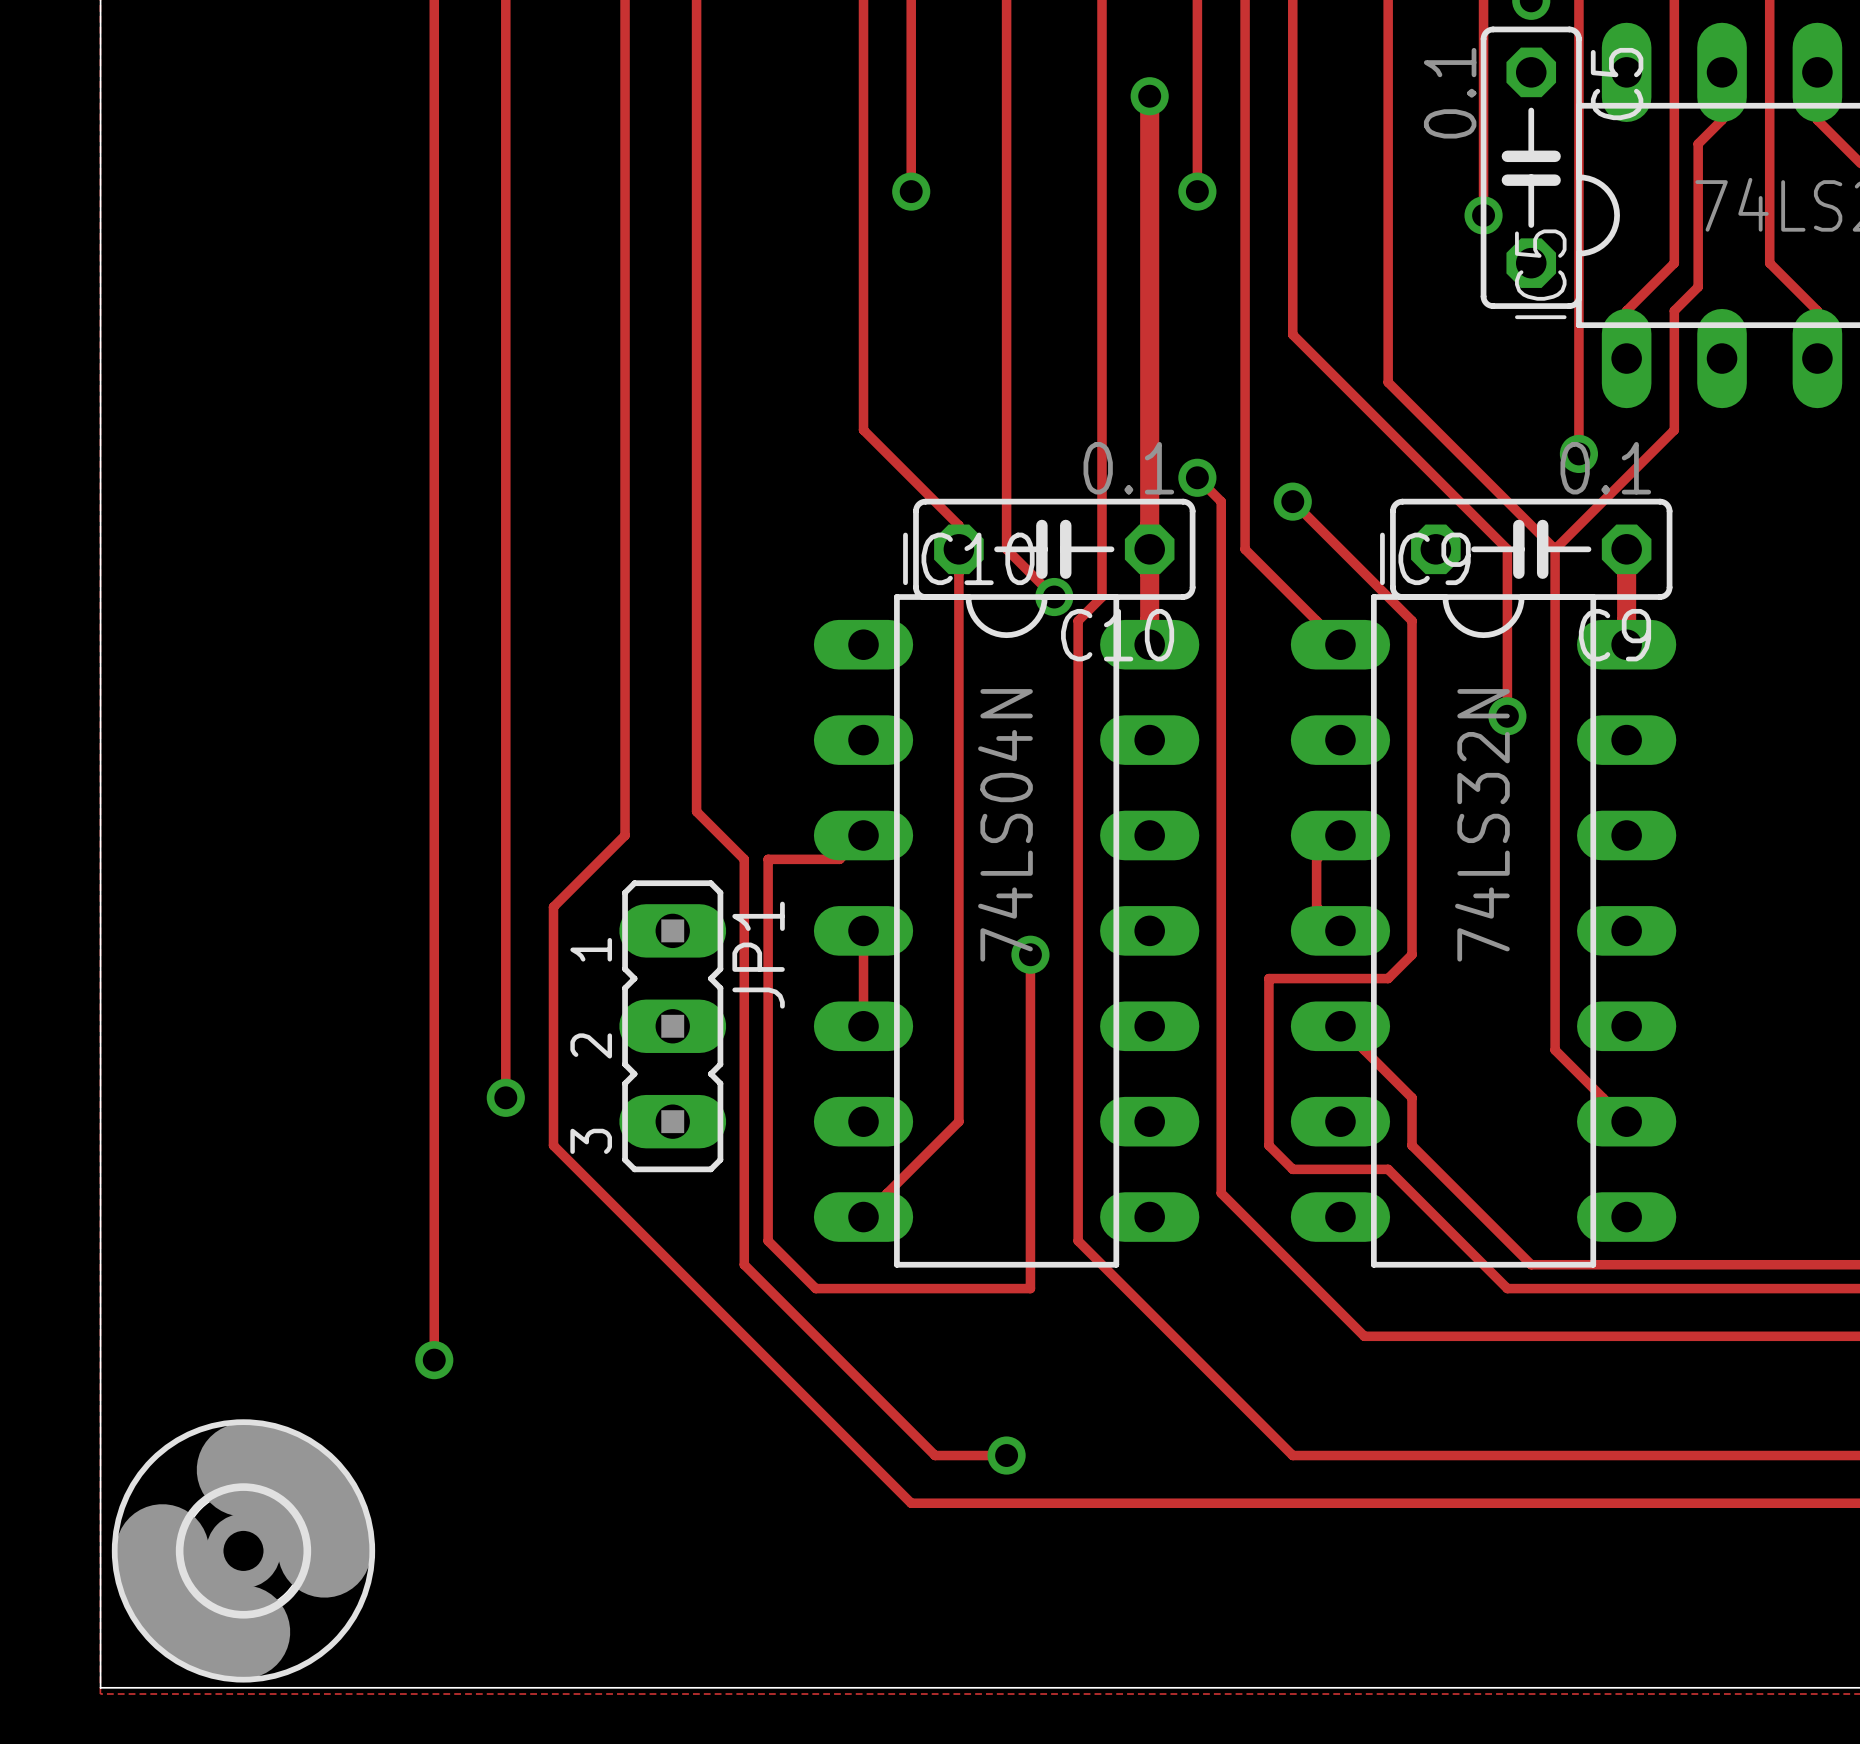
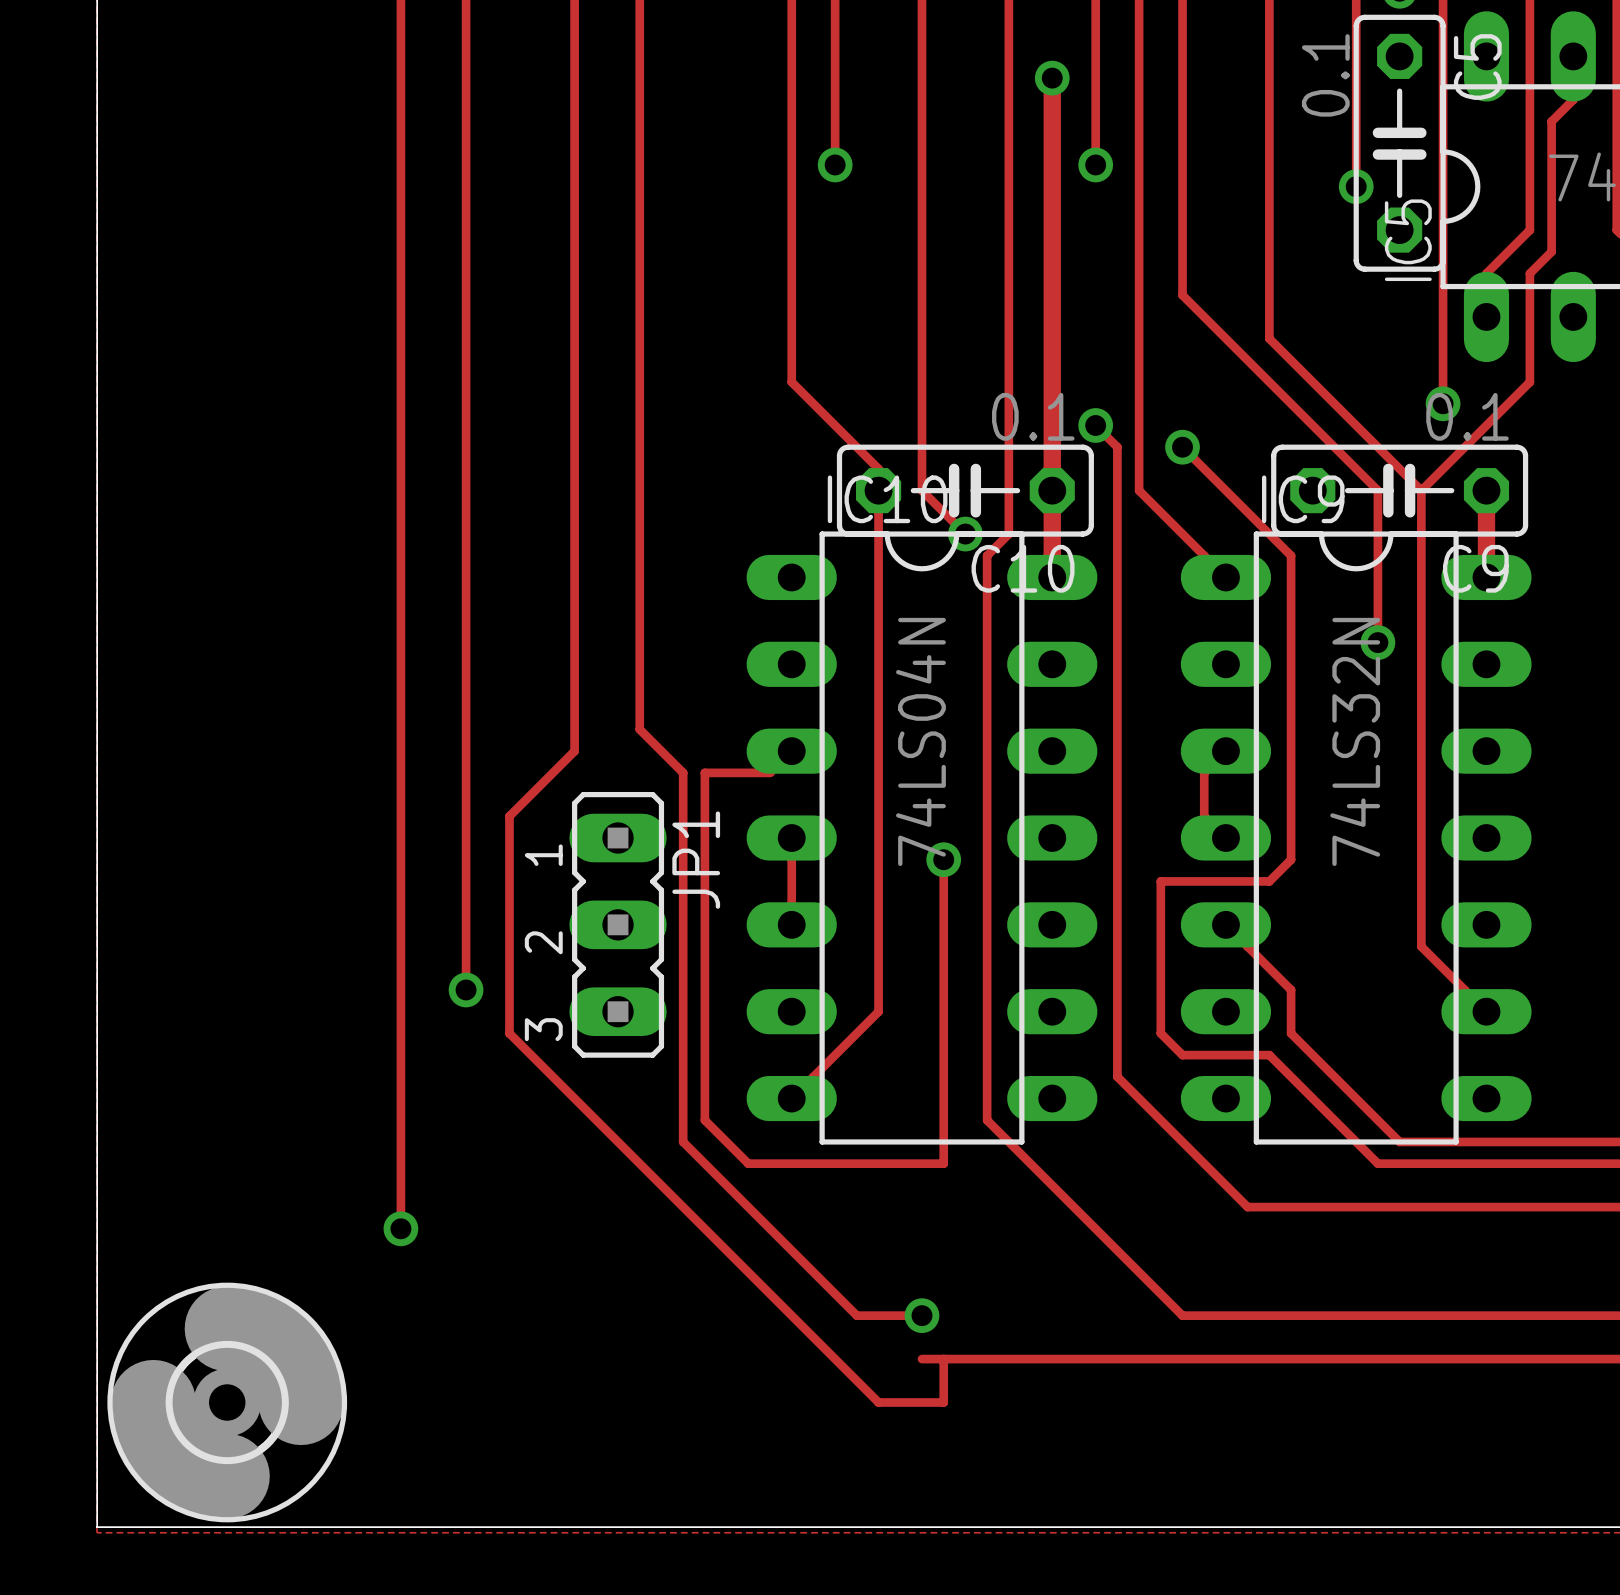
track: (911, 1503) (1006, 1503) -> (835, 1359) (878, 1402) (943, 1402) (943, 1359)

